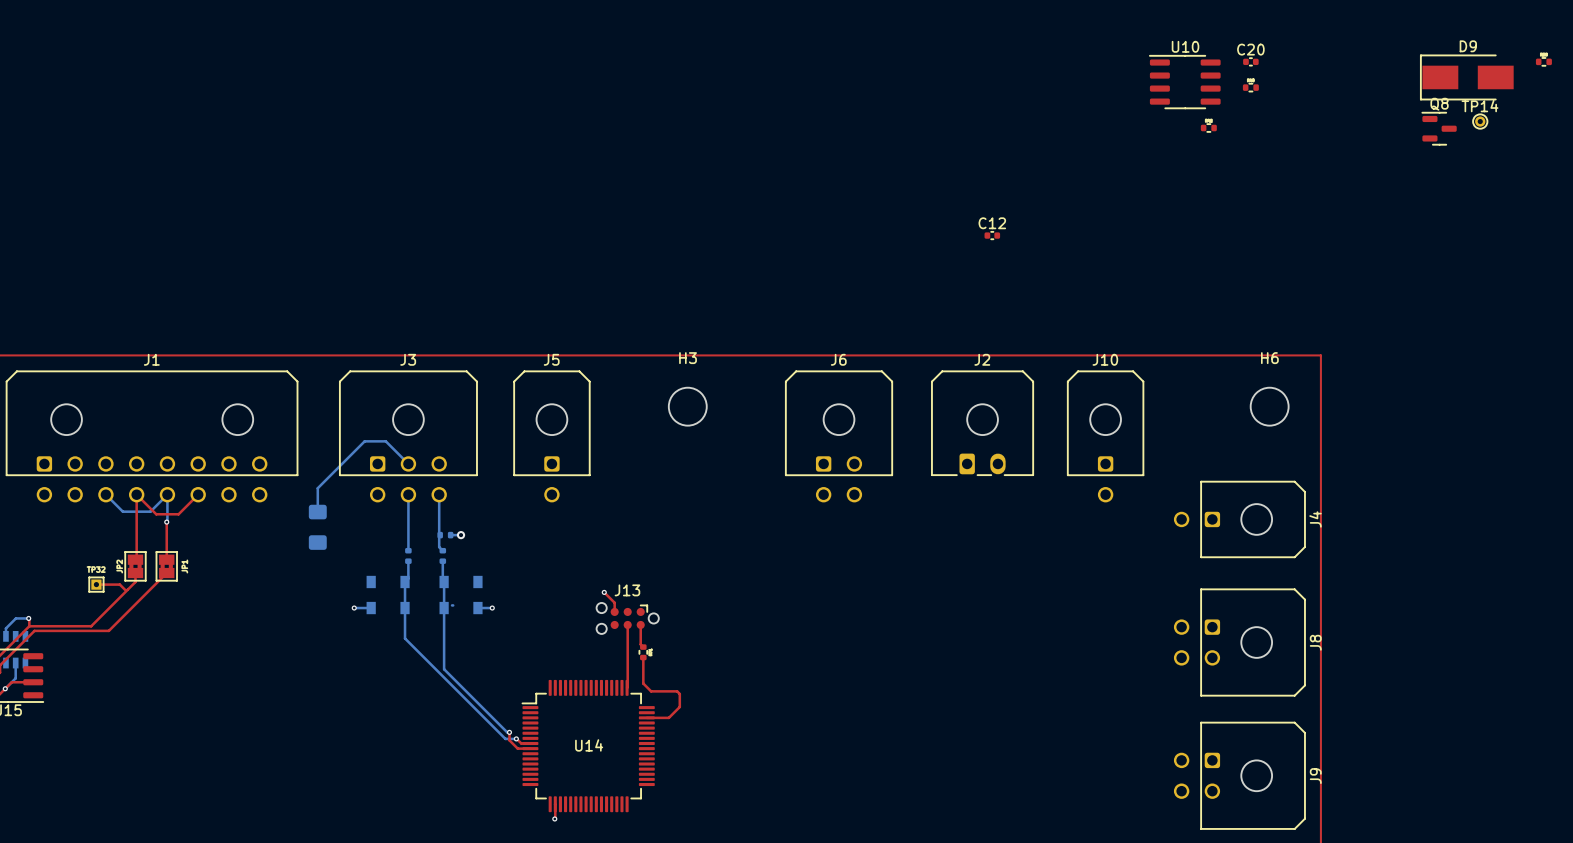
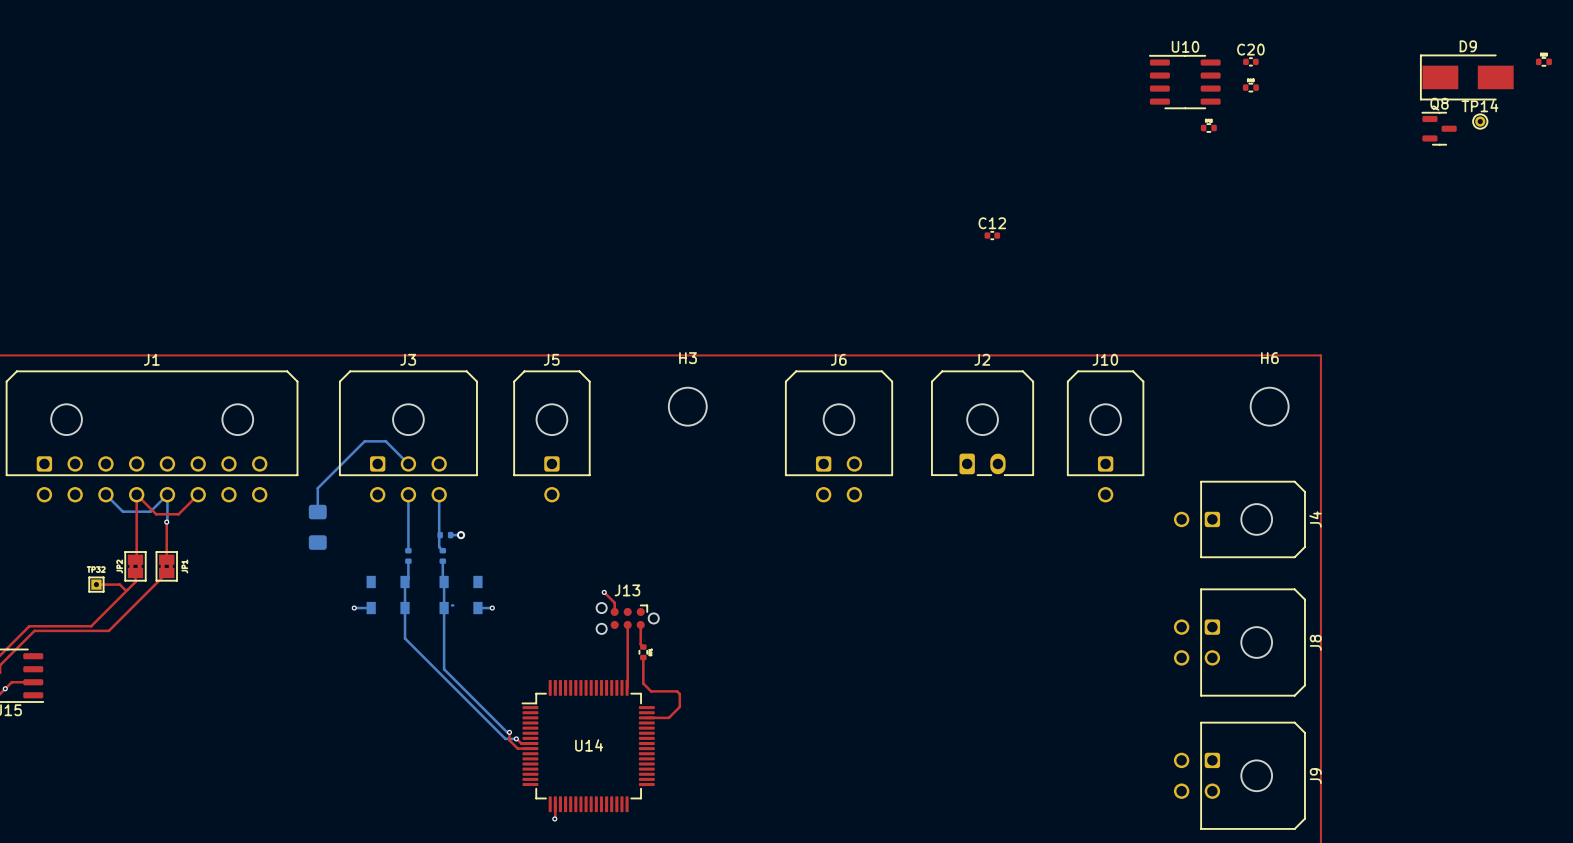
top track: (28, 618) (29, 626) -> none
bottom track: (28, 618) (15, 618) (5, 628) (5, 636) -> none
via: (28, 618) -> none
part: (15, 649) -> none
bottom track: (15, 663) (15, 678) (5, 688) -> none

